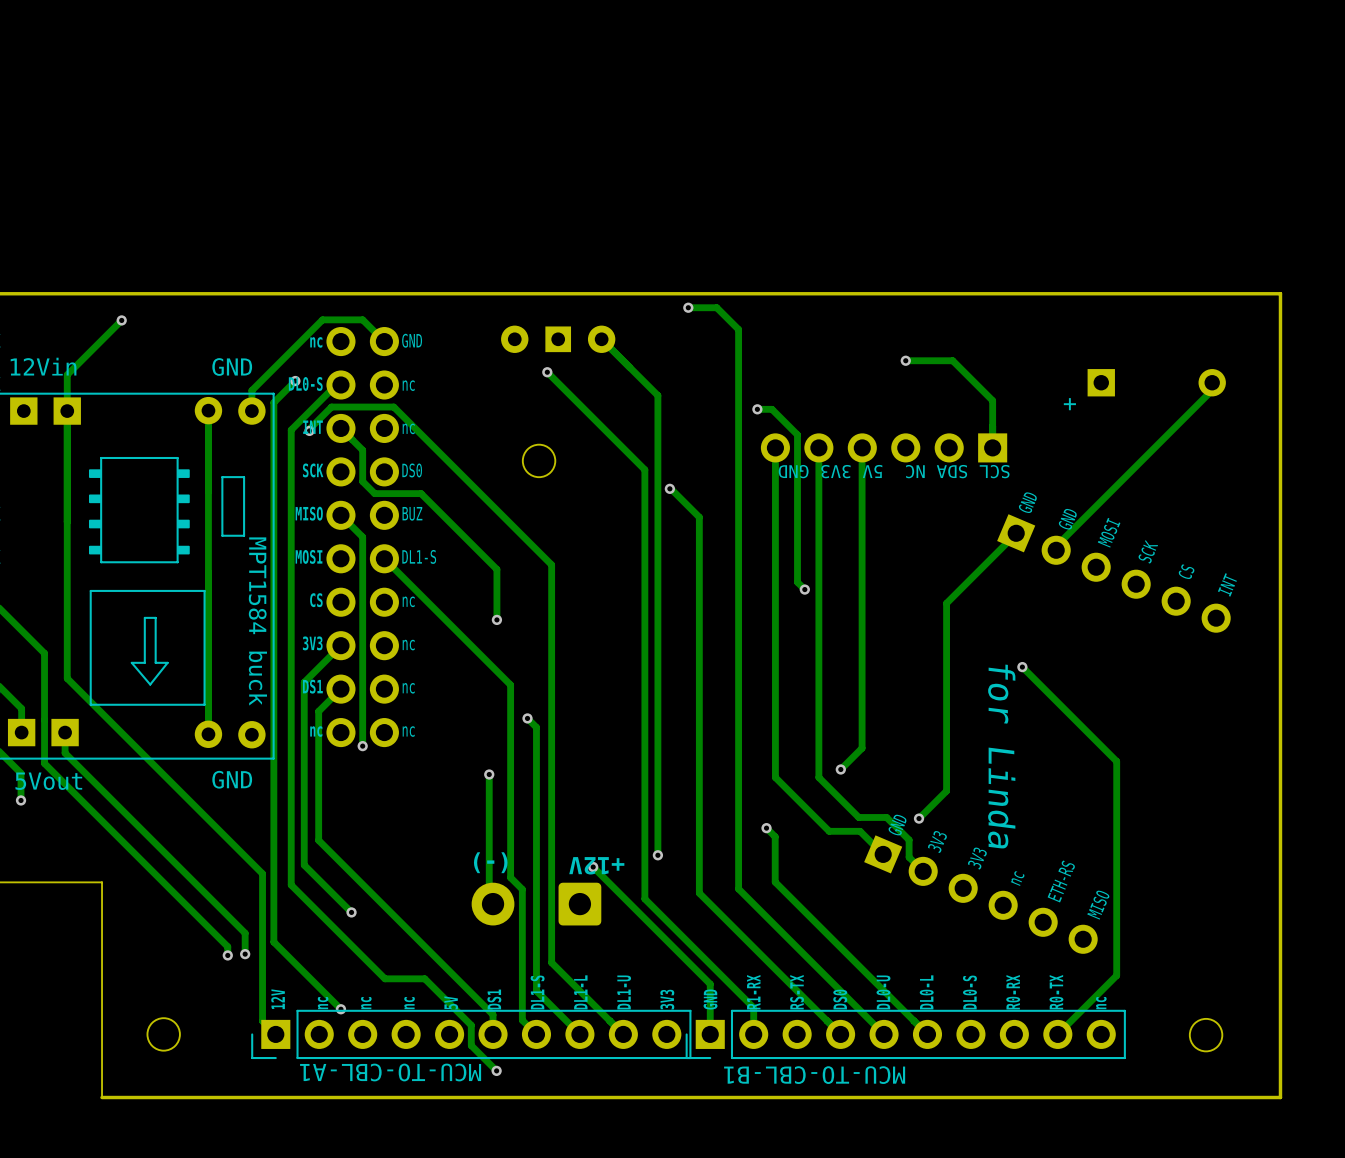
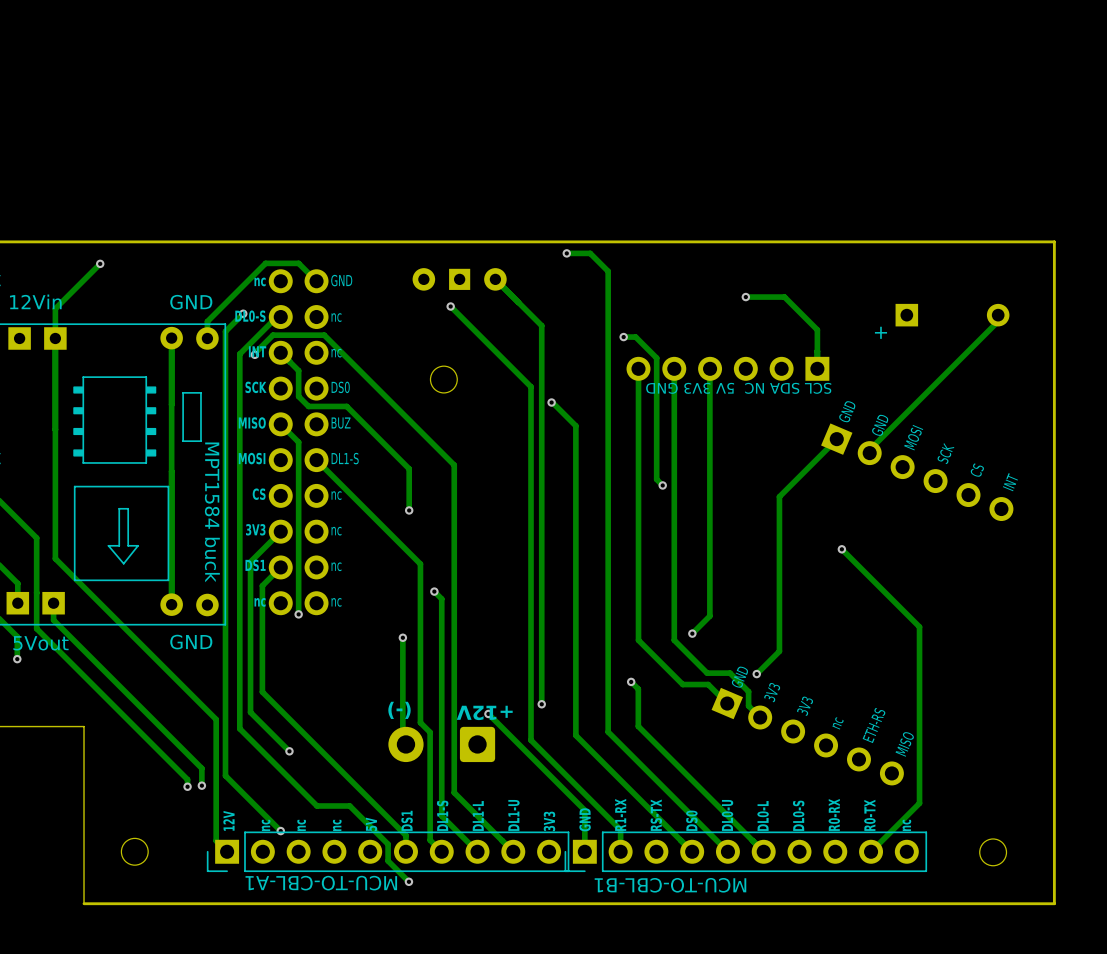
text: for Linda (1001, 756) -> none

